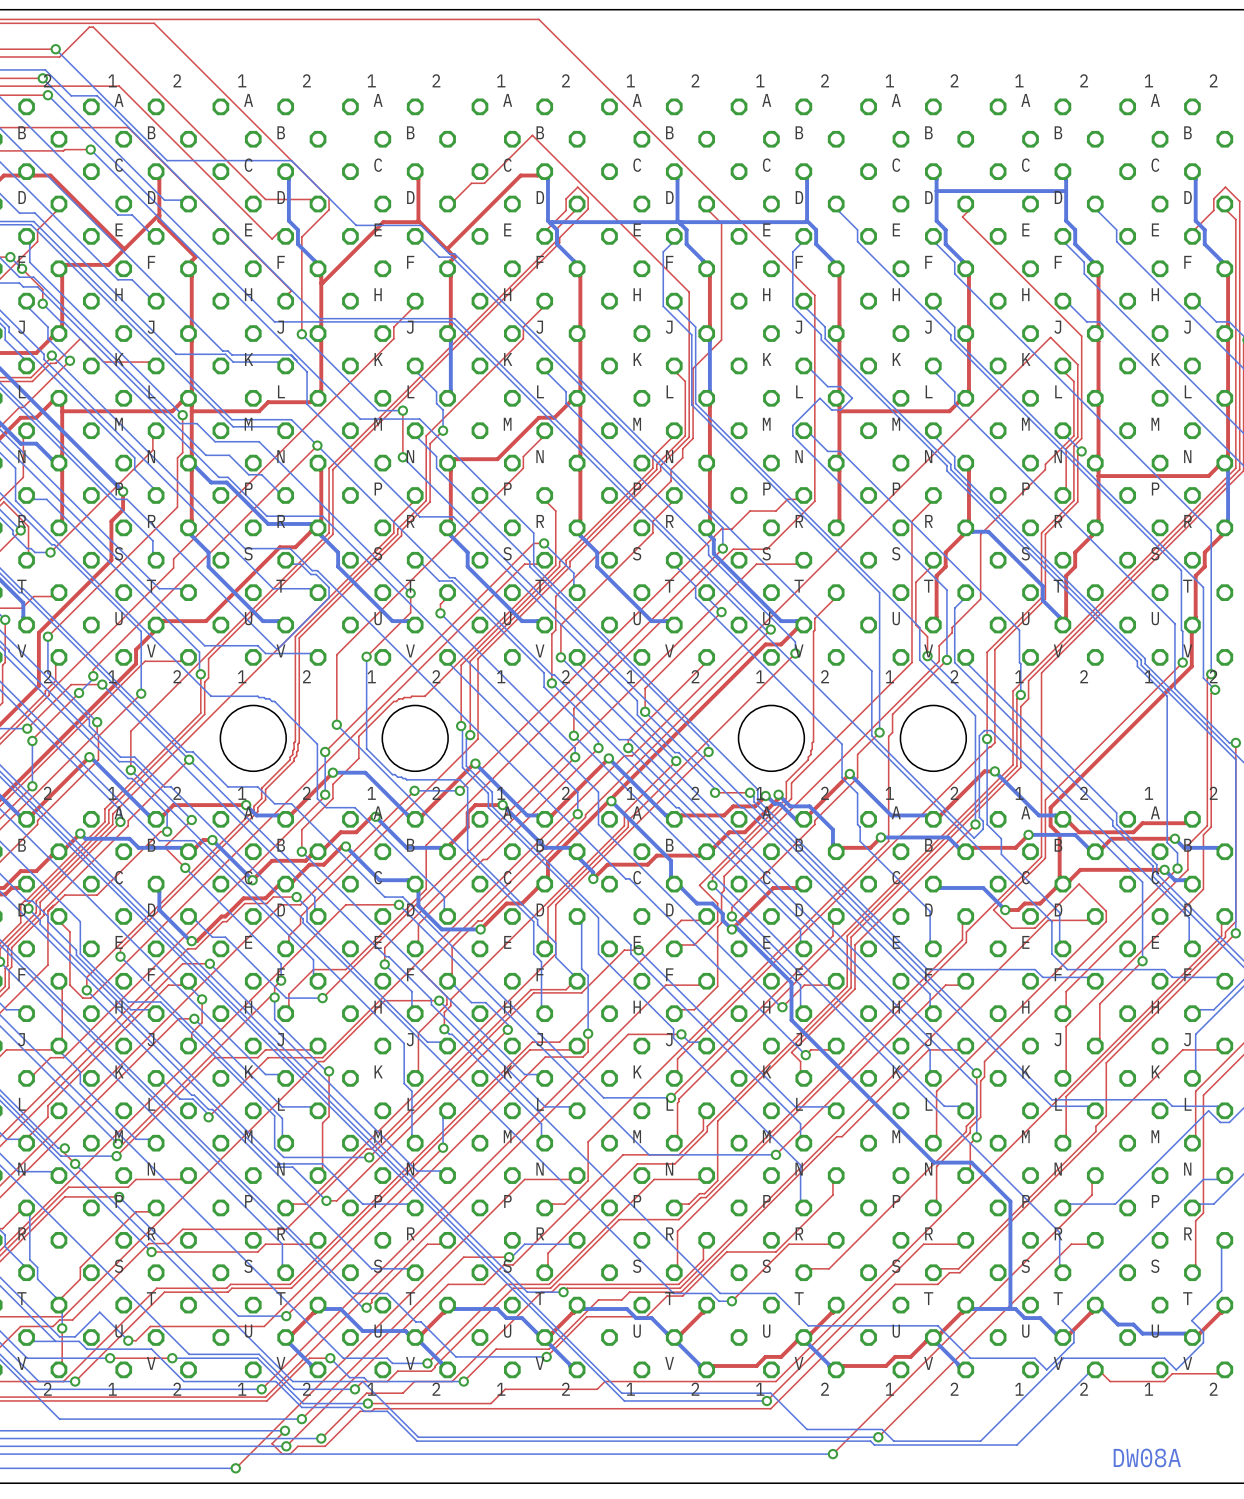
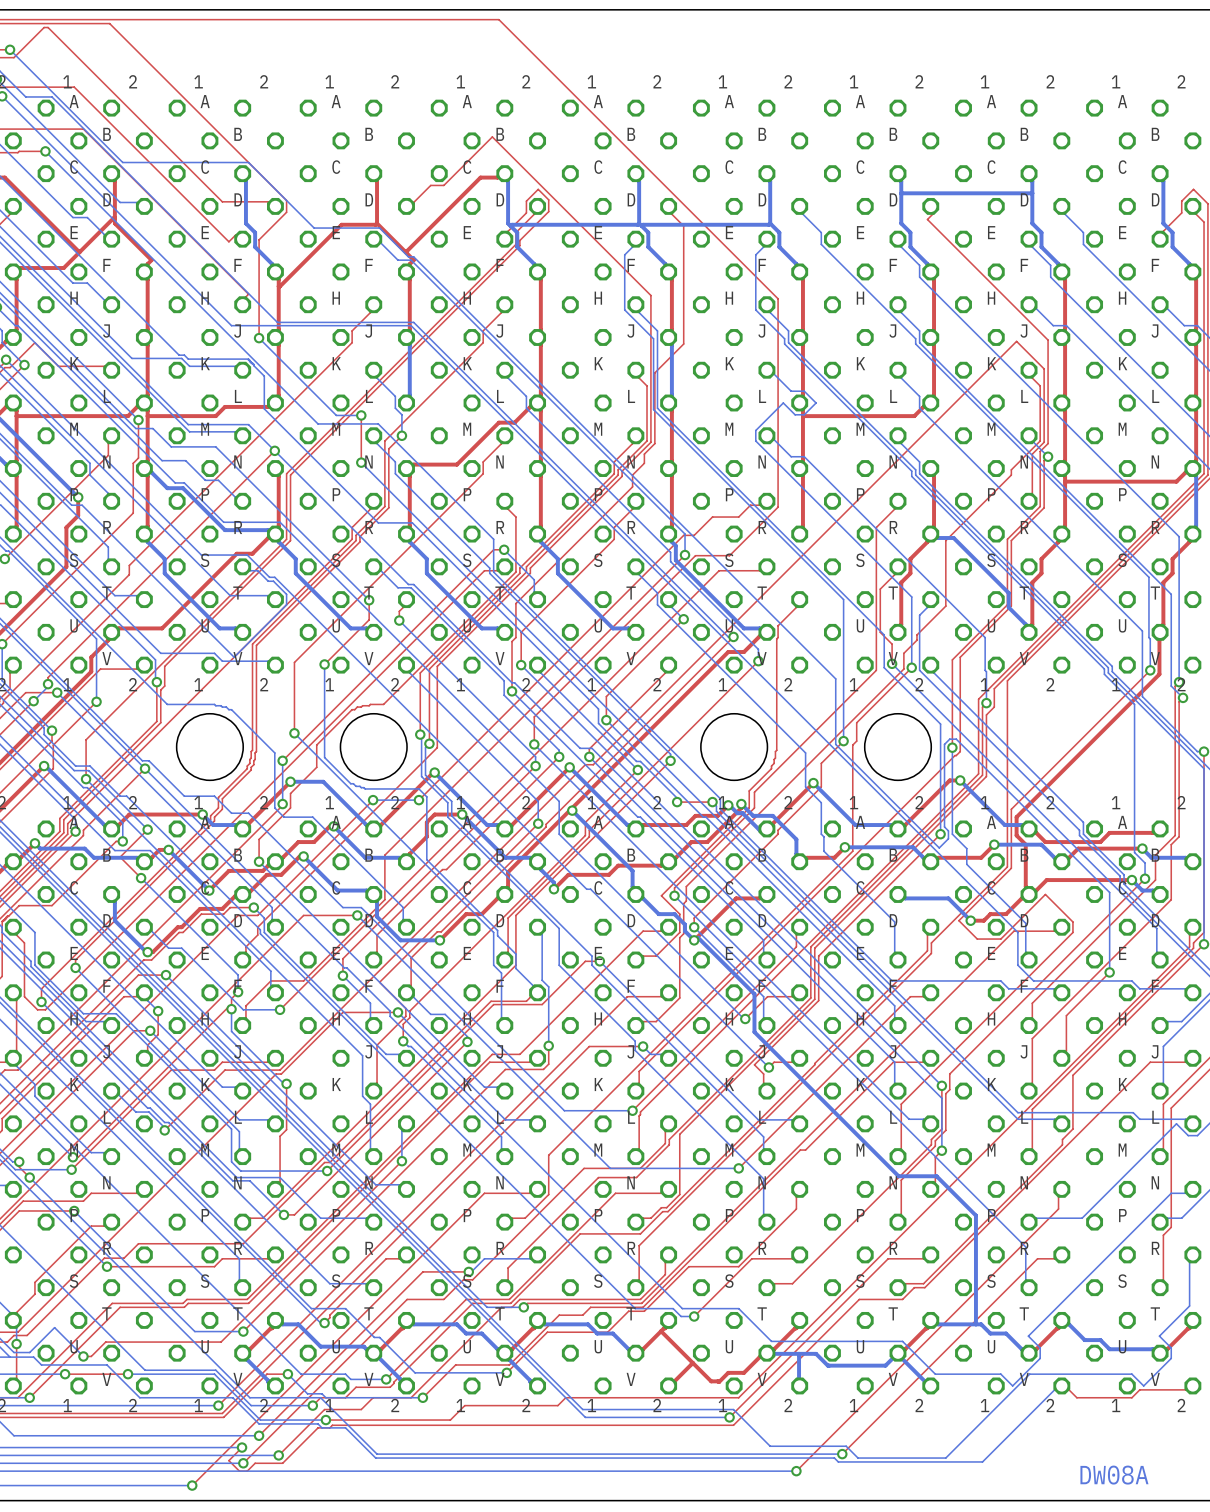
top track: none -> (661, 1331) (711, 1381) (719, 1382)
bottom track: (674, 1337) (699, 1365) (706, 1369) -> none
bottom track: (803, 1337) (829, 1365) (836, 1369) -> (799, 1353) (799, 1385)
top track: (933, 1337) (926, 1341) (910, 1356) (895, 1356) (886, 1365) (843, 1365) (836, 1369) -> none
bottom track: (933, 1337) (958, 1365) (965, 1369) -> (766, 1353) (816, 1353) (827, 1365) (885, 1365) (897, 1353) (930, 1385)
top track: (756, 1365) (713, 1365) (706, 1369) -> (692, 1363) (668, 1385)

